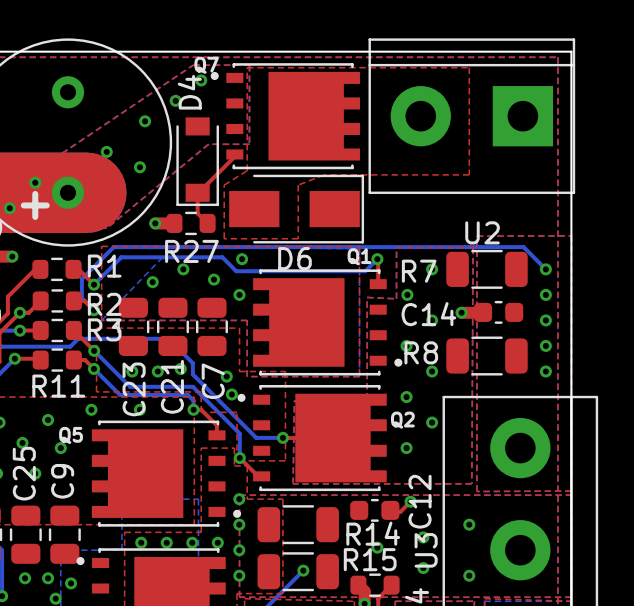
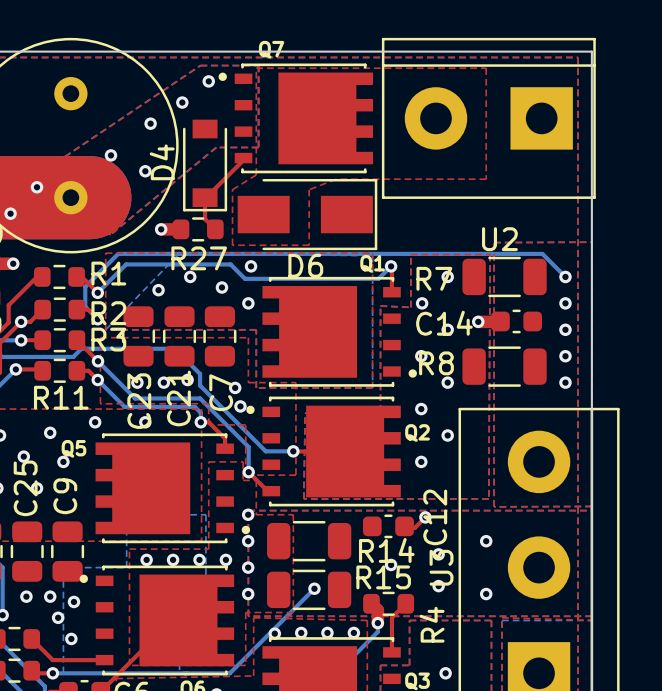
Q7 name position: Q7 (206, 65) -> Q7 (271, 49)
D4 name position: D4 (189, 92) -> D4 (162, 162)
text: + (35, 205) -> none

